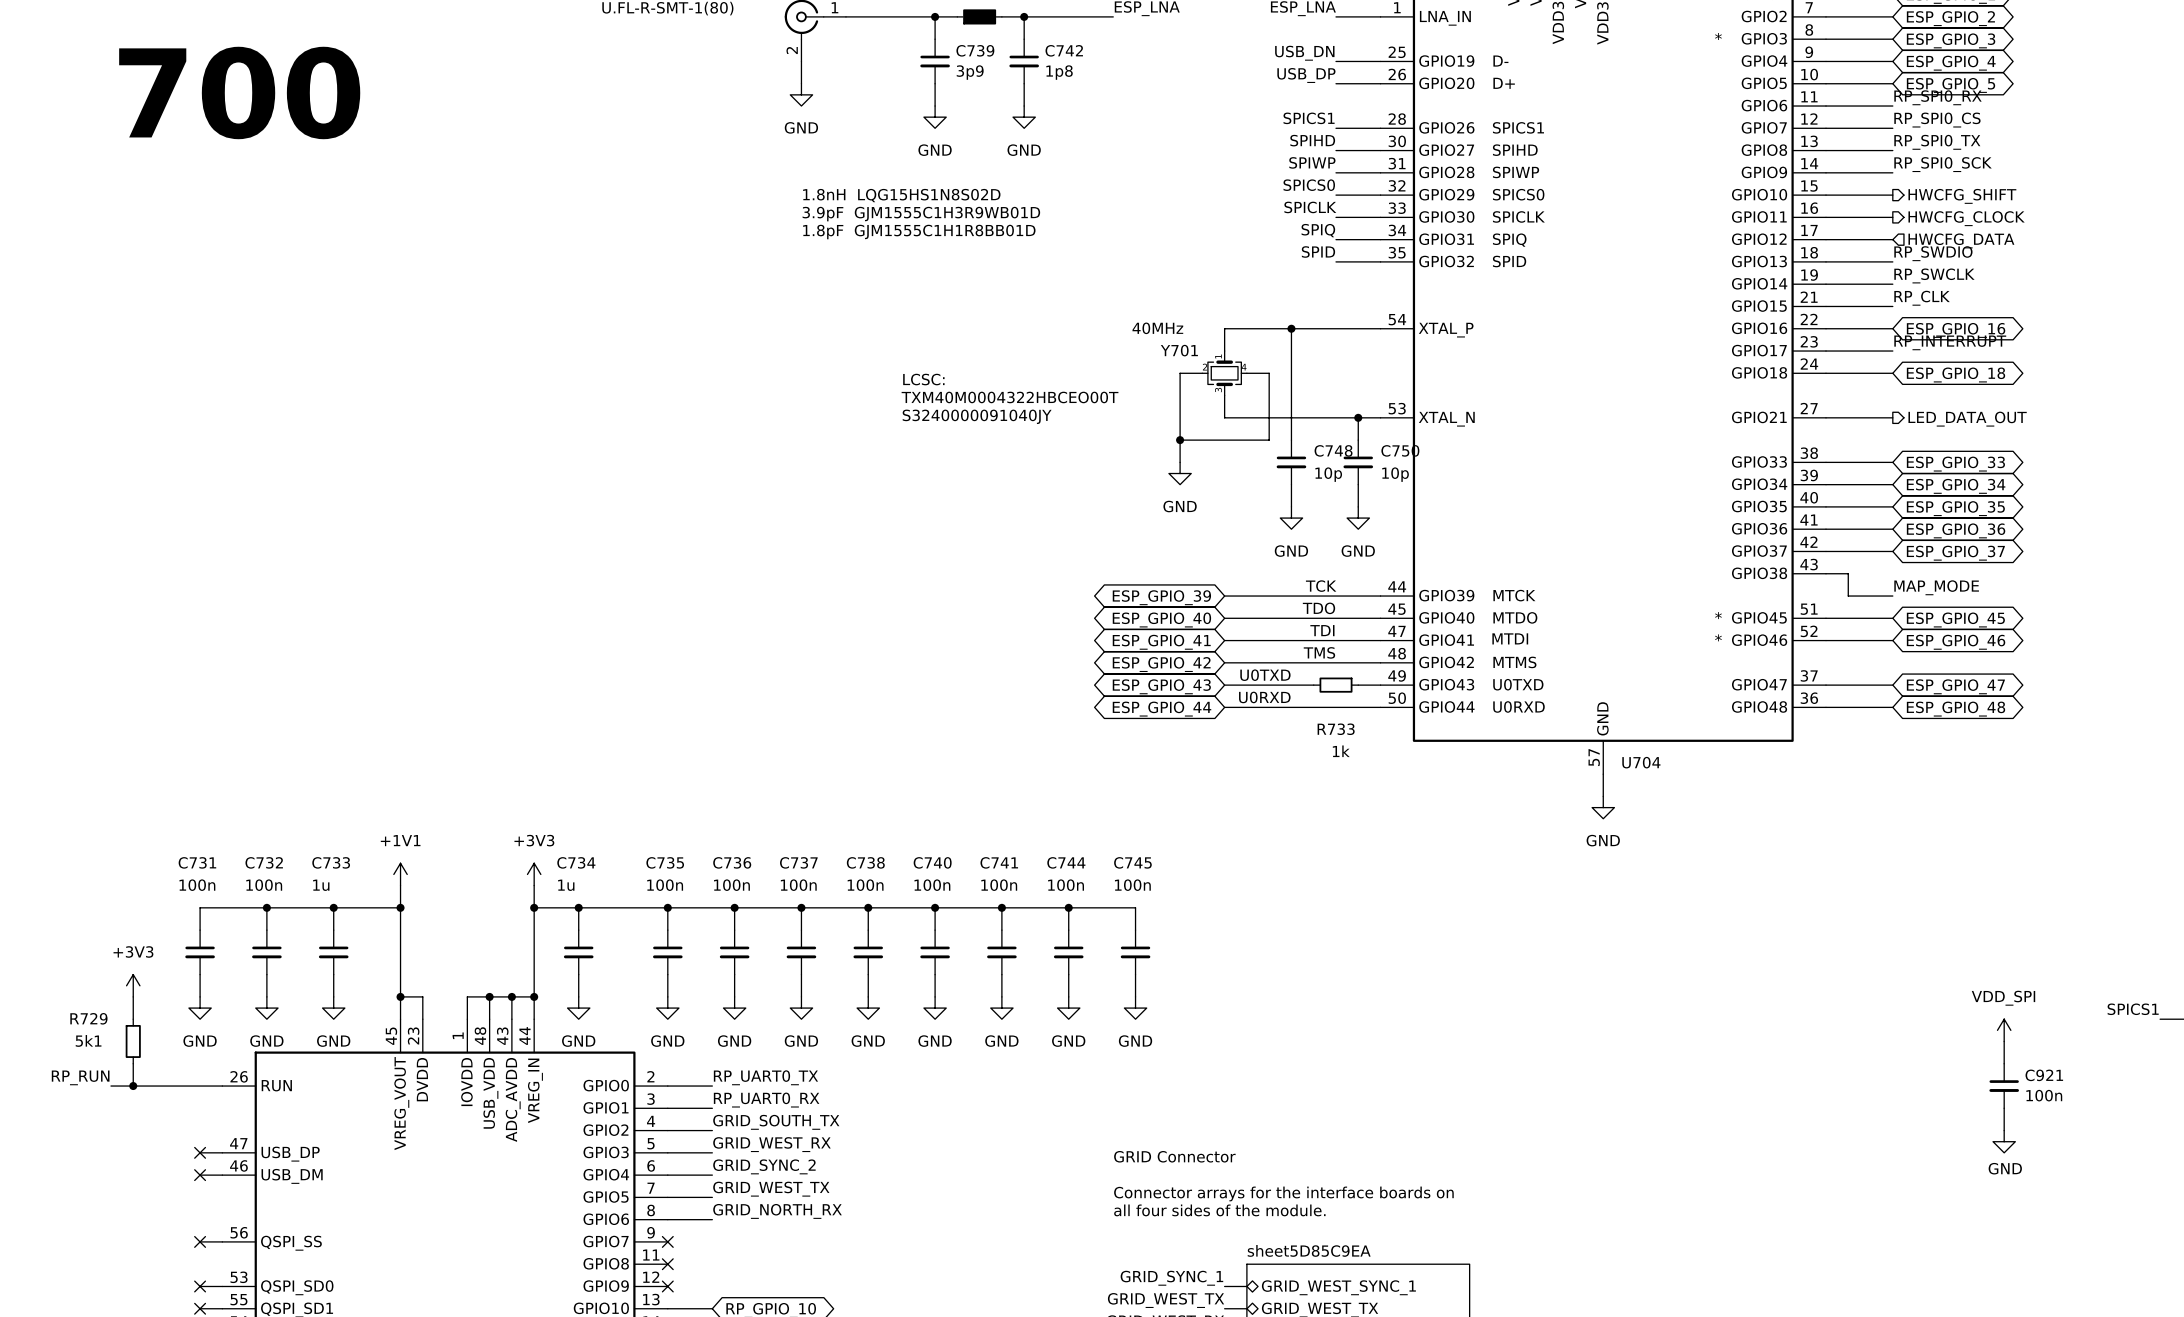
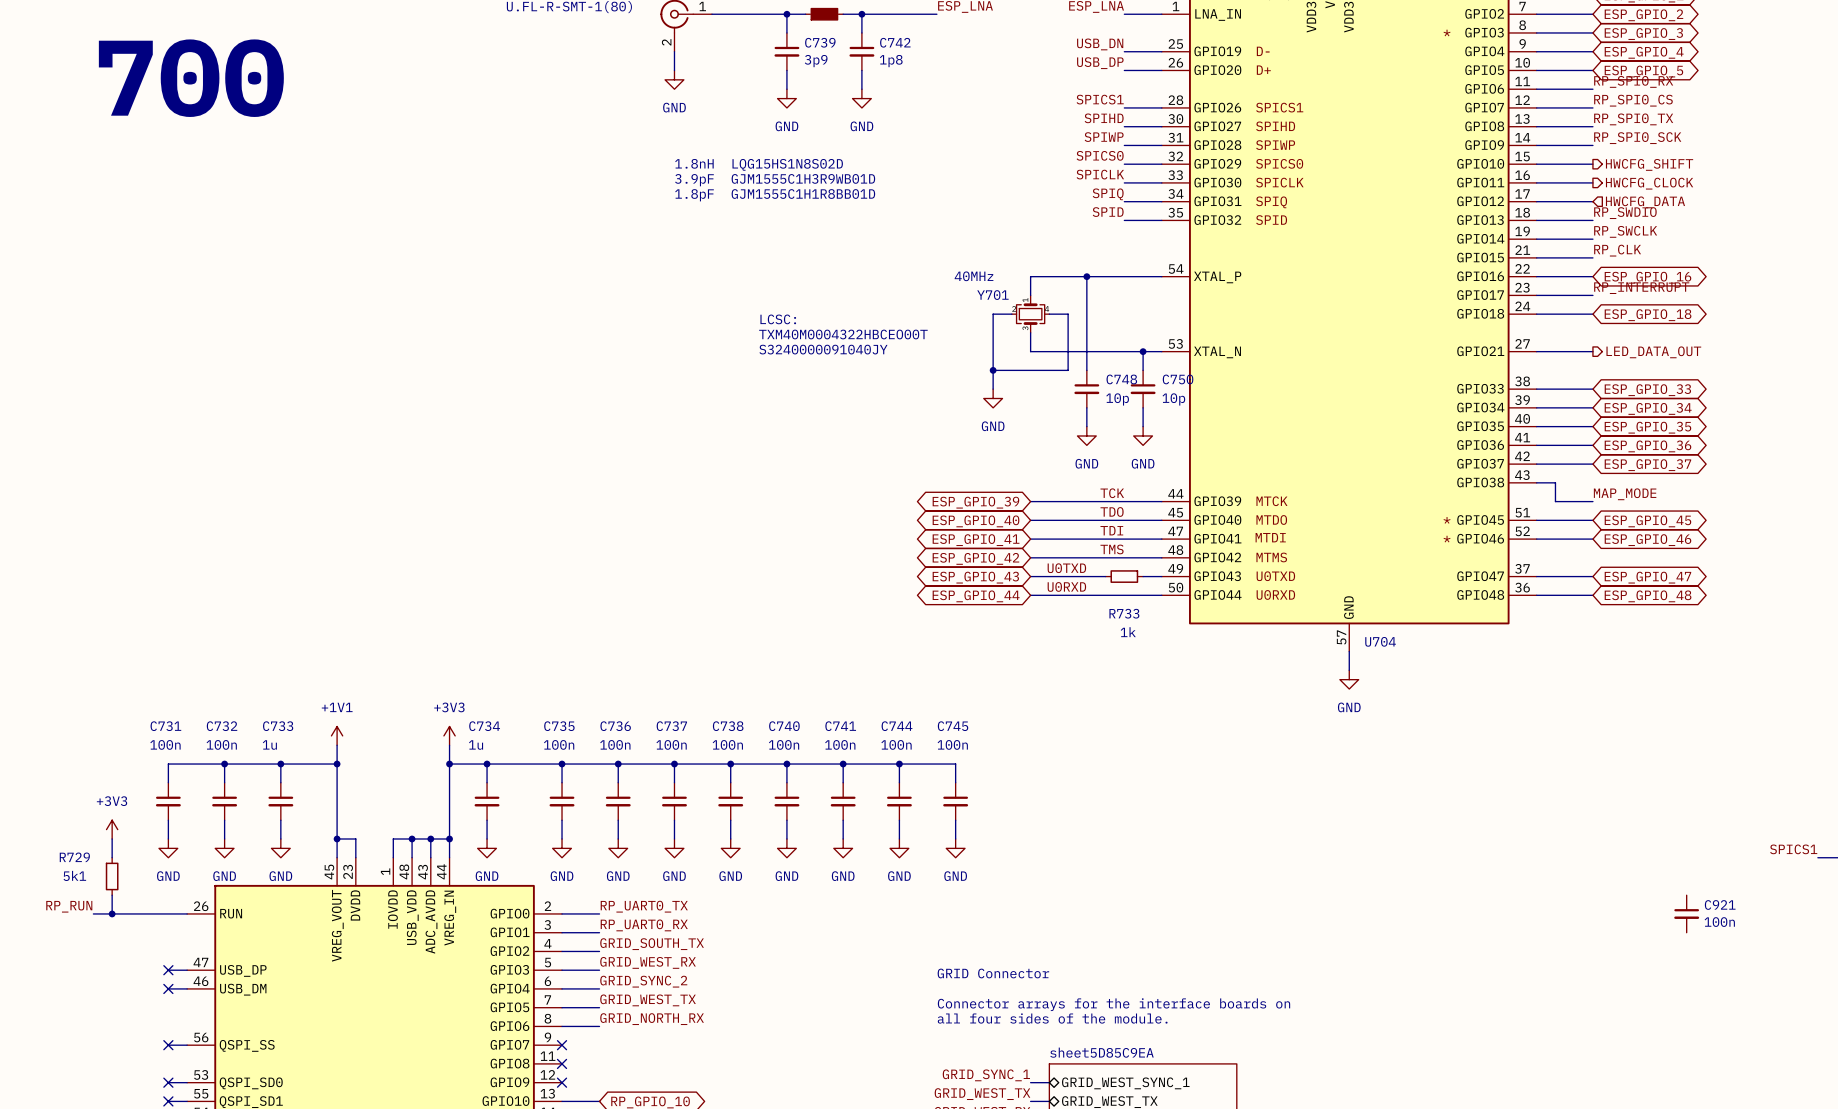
power symbol: VDD_SPI (2004, 1030) -> none
wire: (2004, 1041) (2004, 1063) -> none
wire: (2004, 1108) (2004, 1130) -> none
power symbol: GND (2004, 1141) -> none

